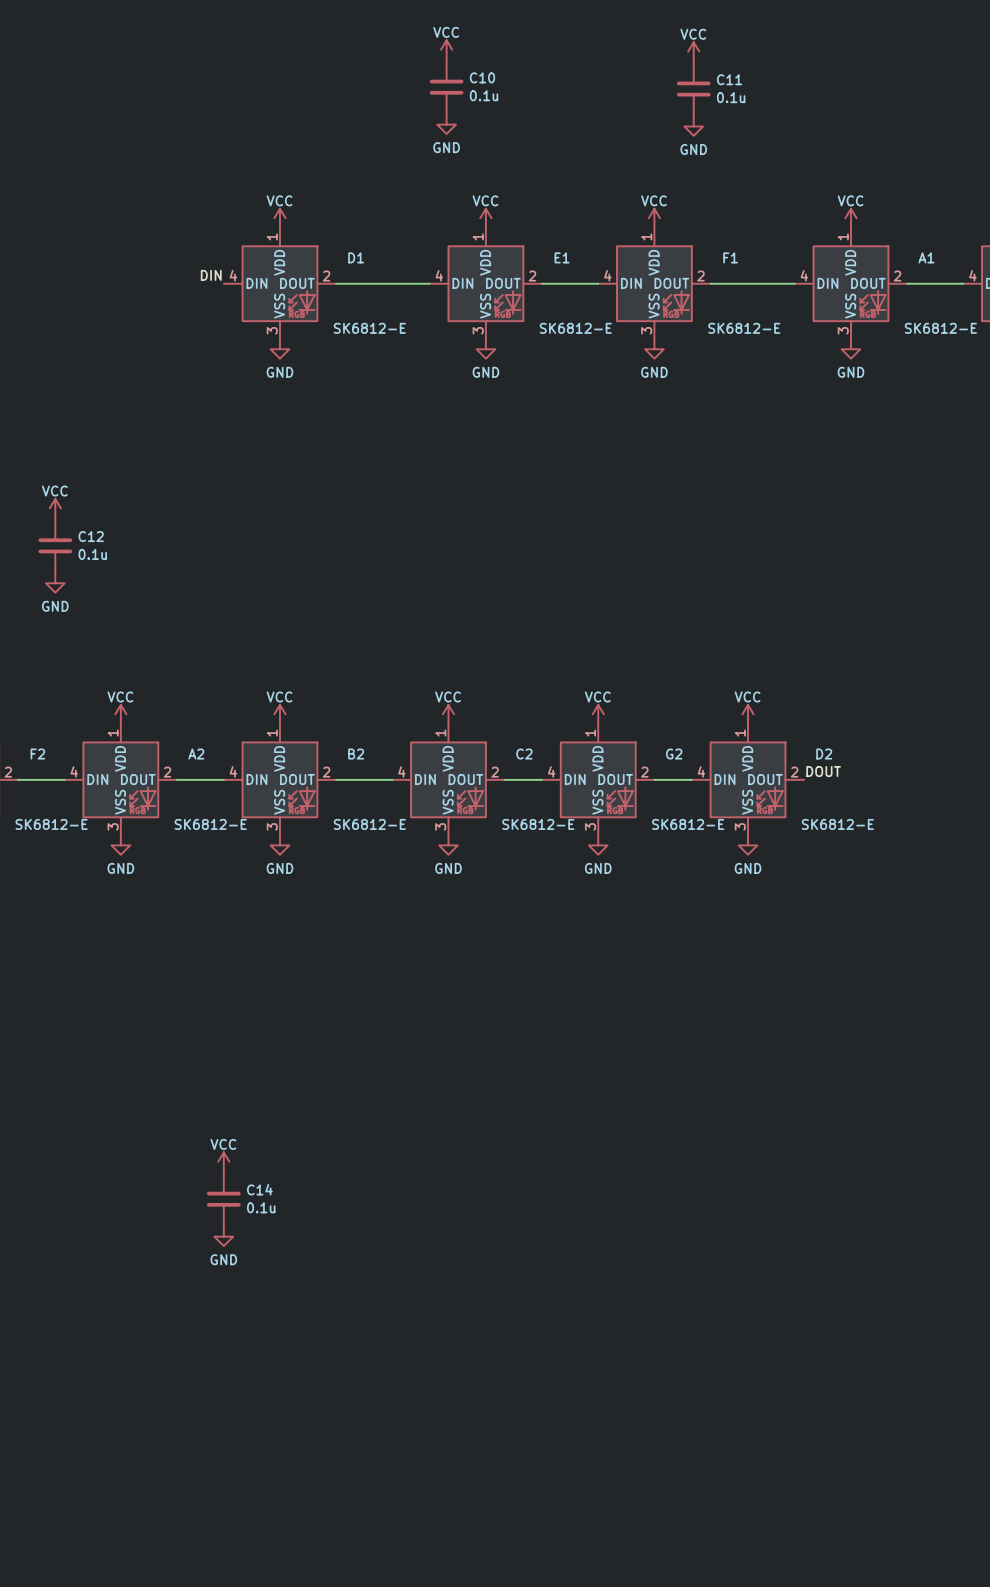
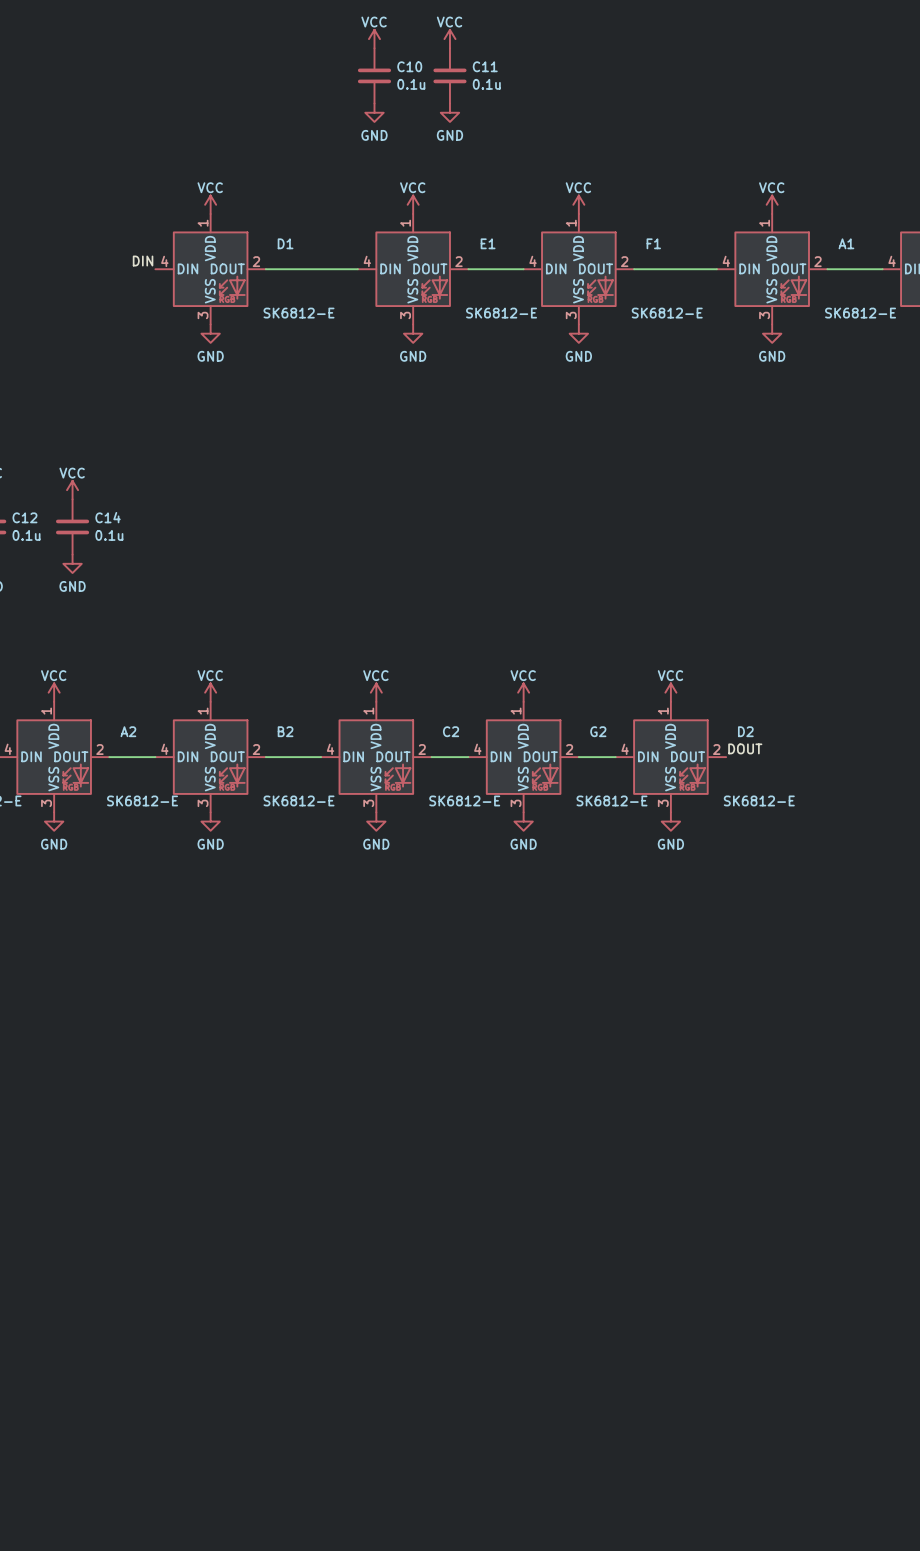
power symbol position: VCC (693, 51) -> VCC (449, 39)
C11 position: (693, 89) -> (449, 75)
power symbol position: GND (693, 126) -> GND (449, 112)
power symbol: none -> VCC (72, 490)
power symbol: none -> GND (72, 563)
power symbol: VCC (223, 1161) -> none
C14 position: (223, 1199) -> (72, 526)
power symbol: GND (223, 1236) -> none

